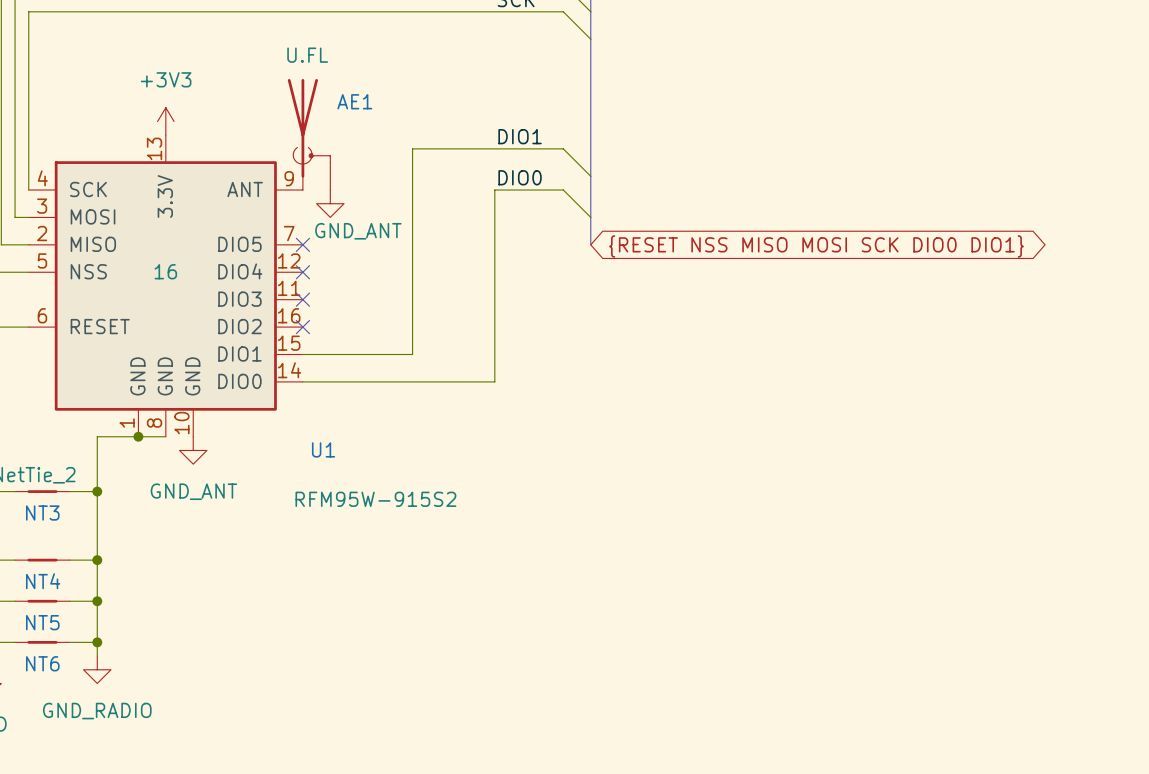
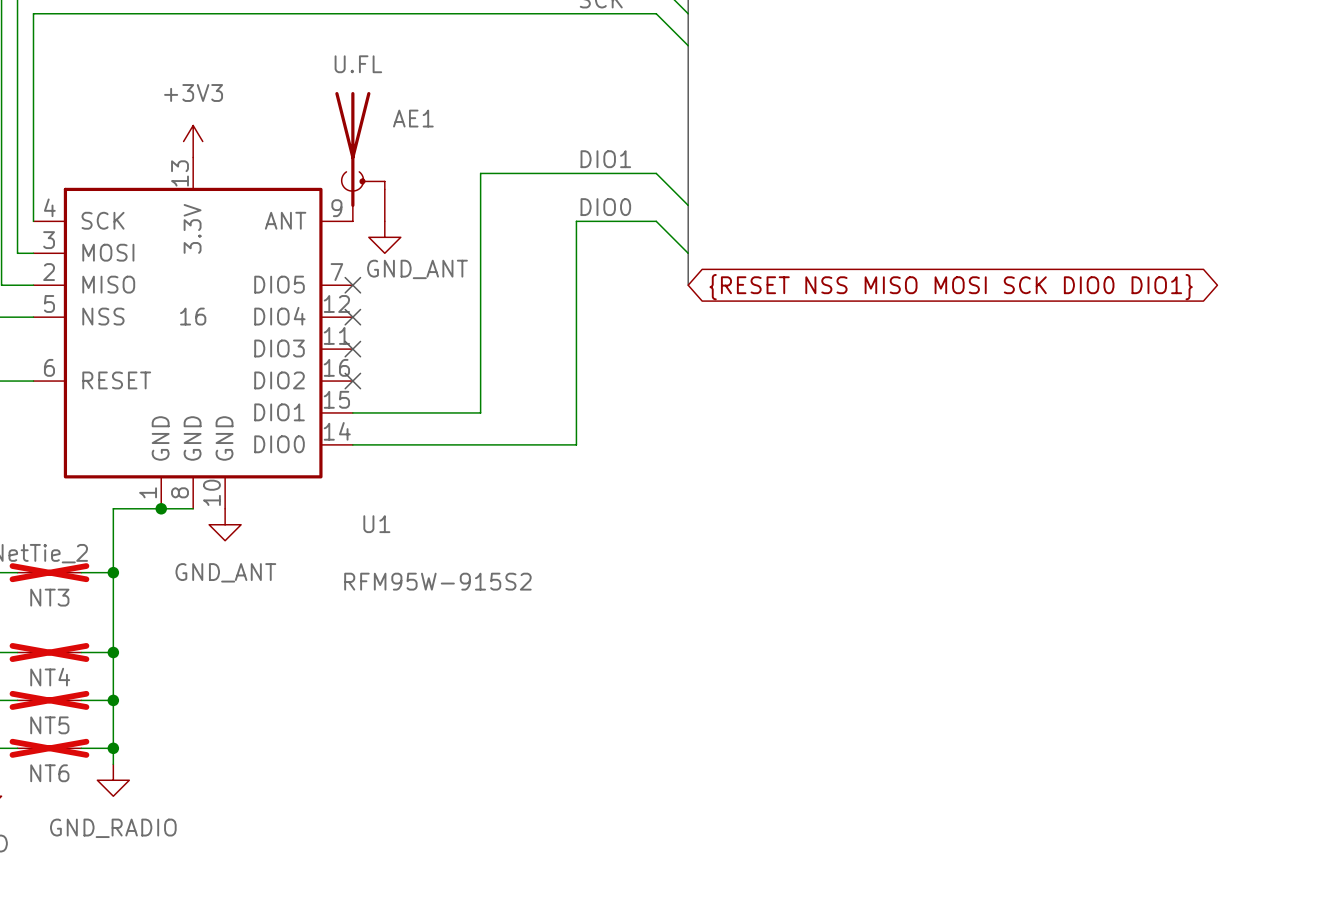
NT3 do-not-place cross: none -> (49, 572)
NT4 do-not-place cross: none -> (49, 652)
NT5 do-not-place cross: none -> (49, 700)
NT6 do-not-place cross: none -> (49, 748)

